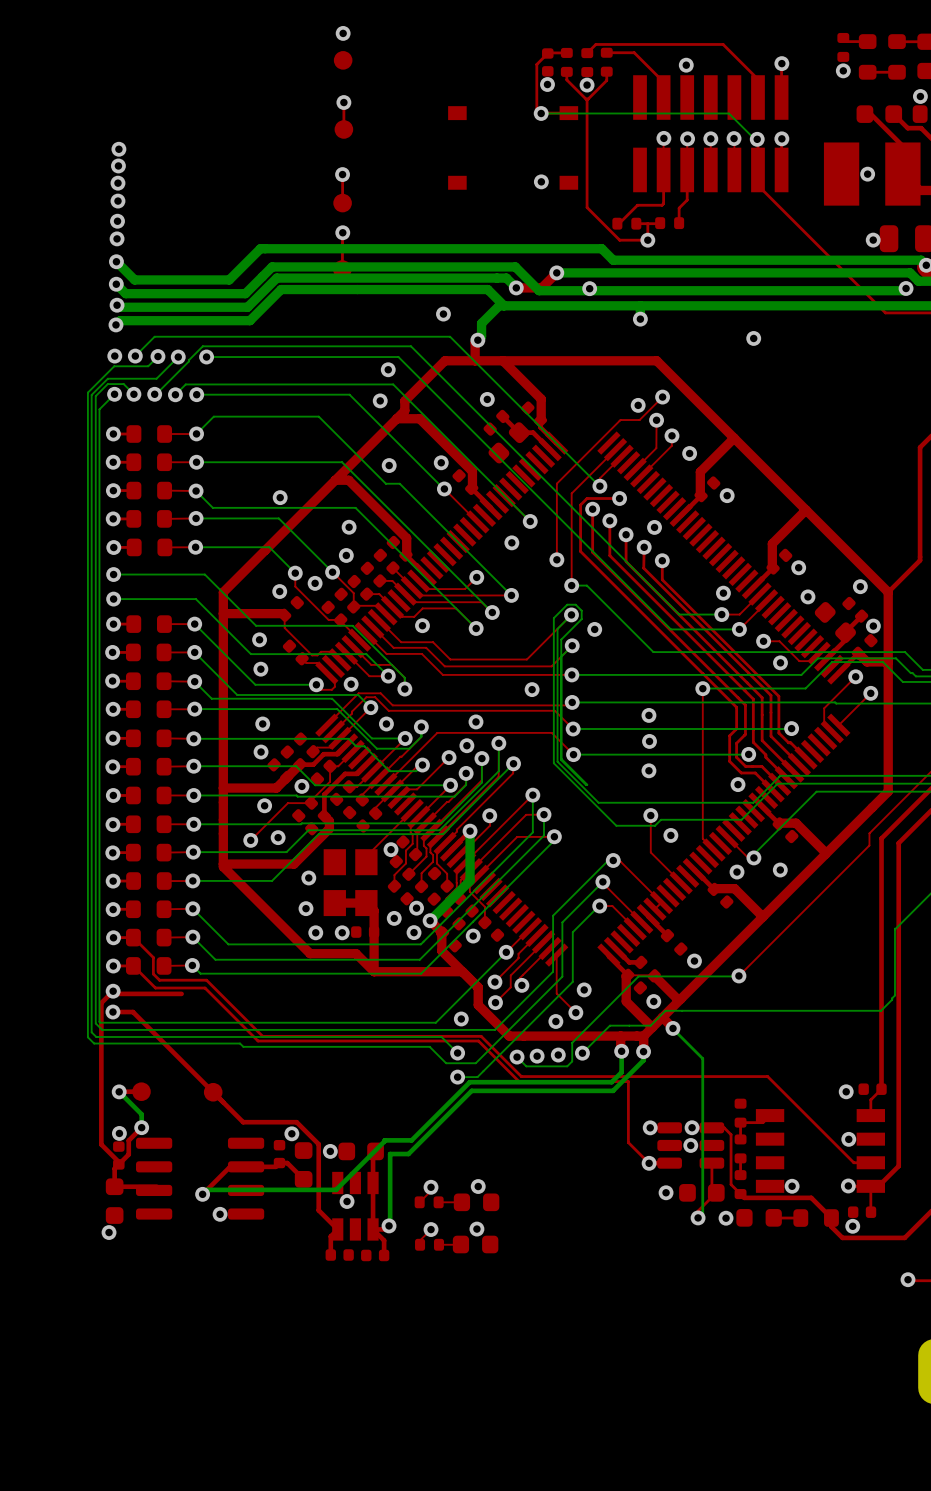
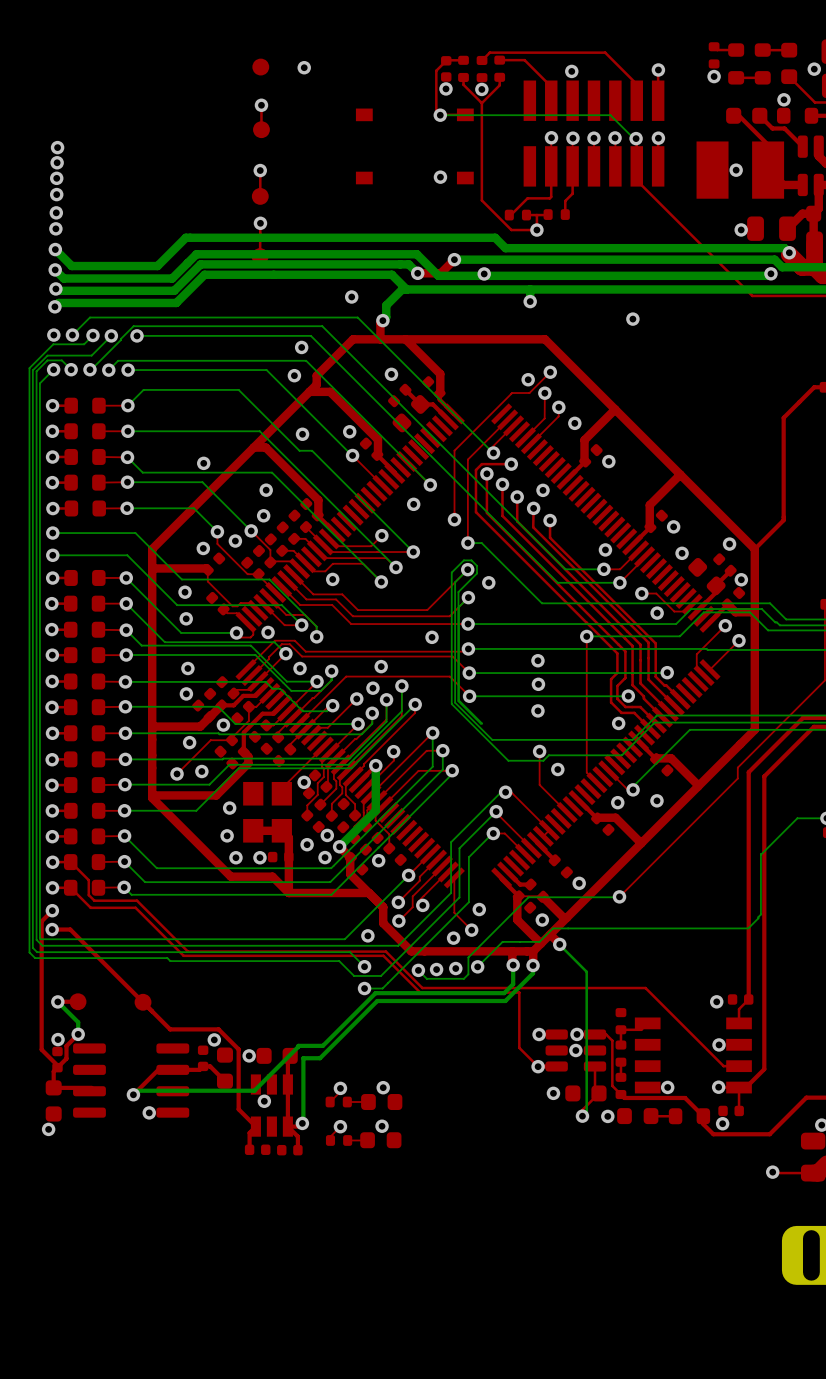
via position: (343, 33) -> (304, 67)
top track: (181, 993) (115, 993) -> none

